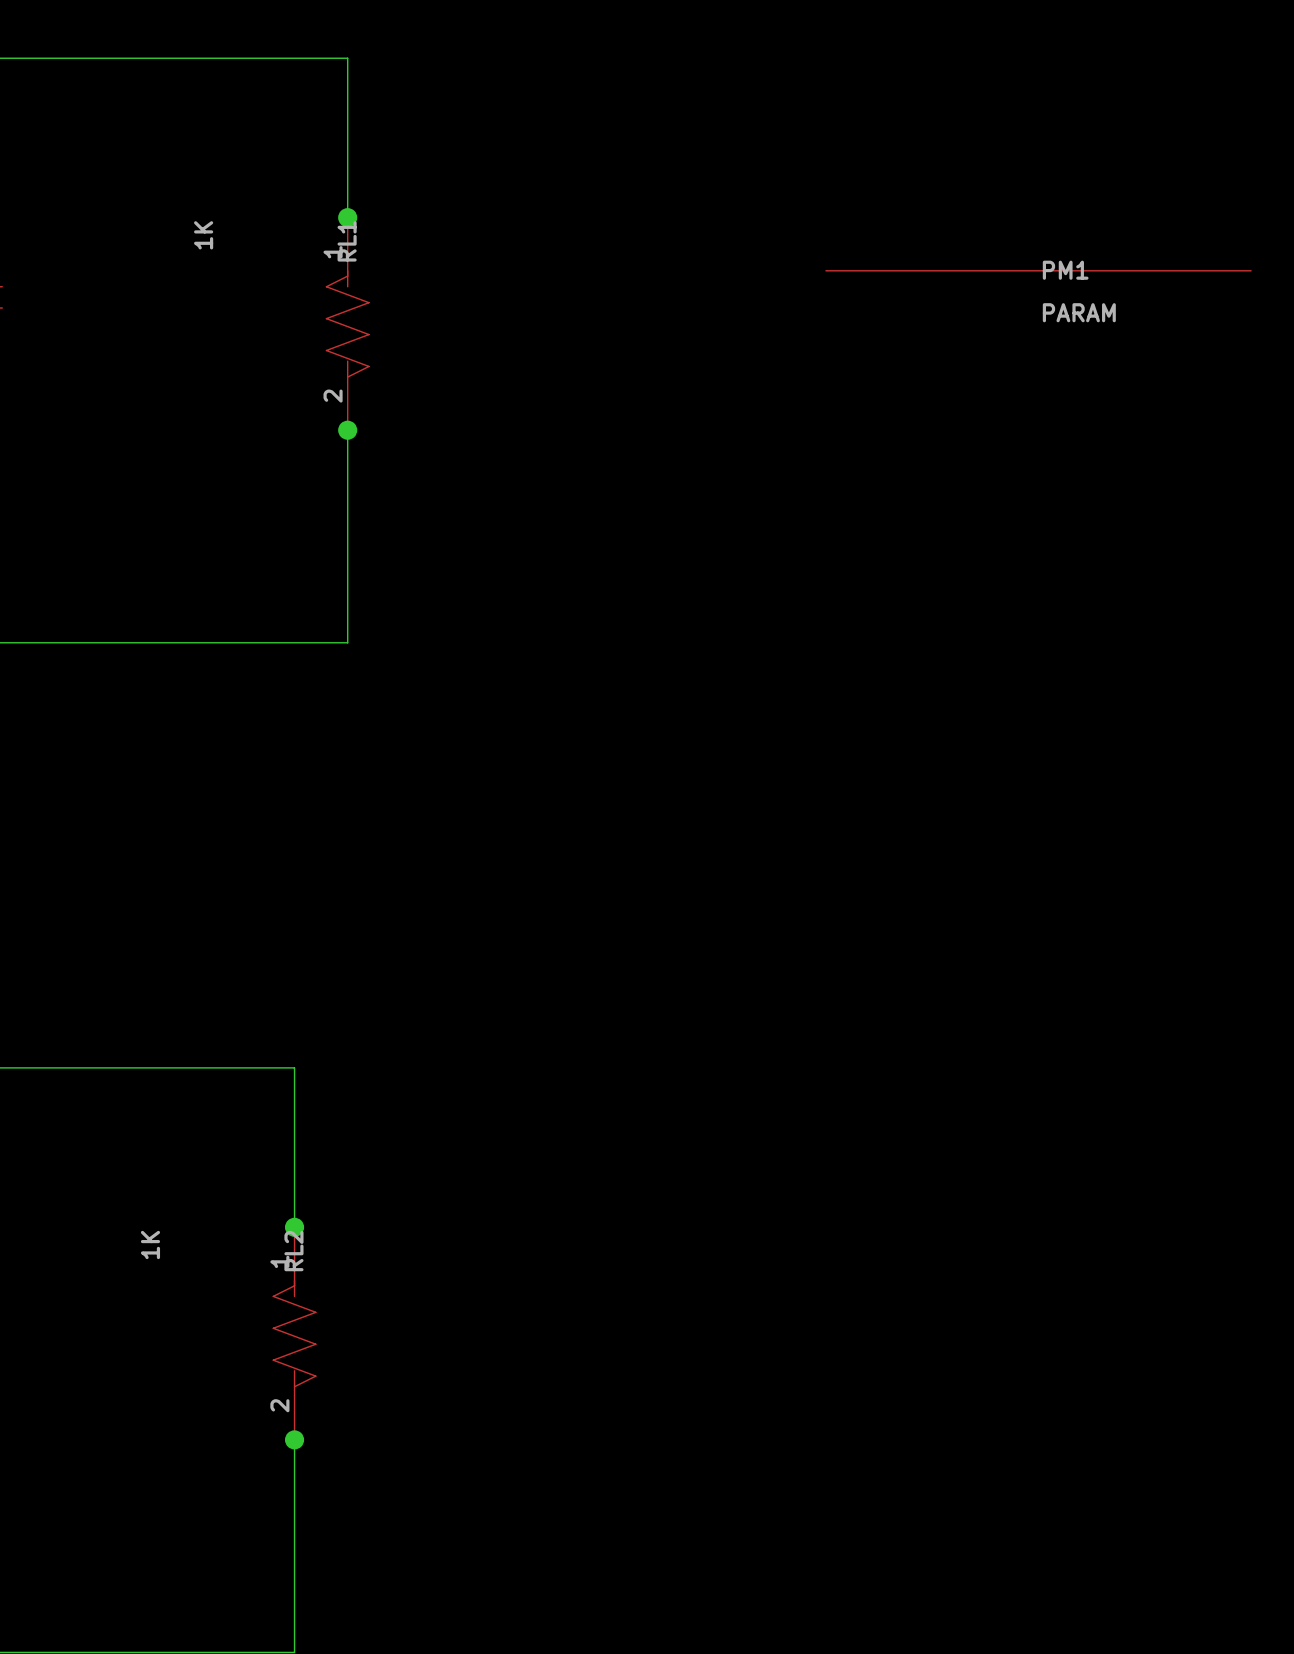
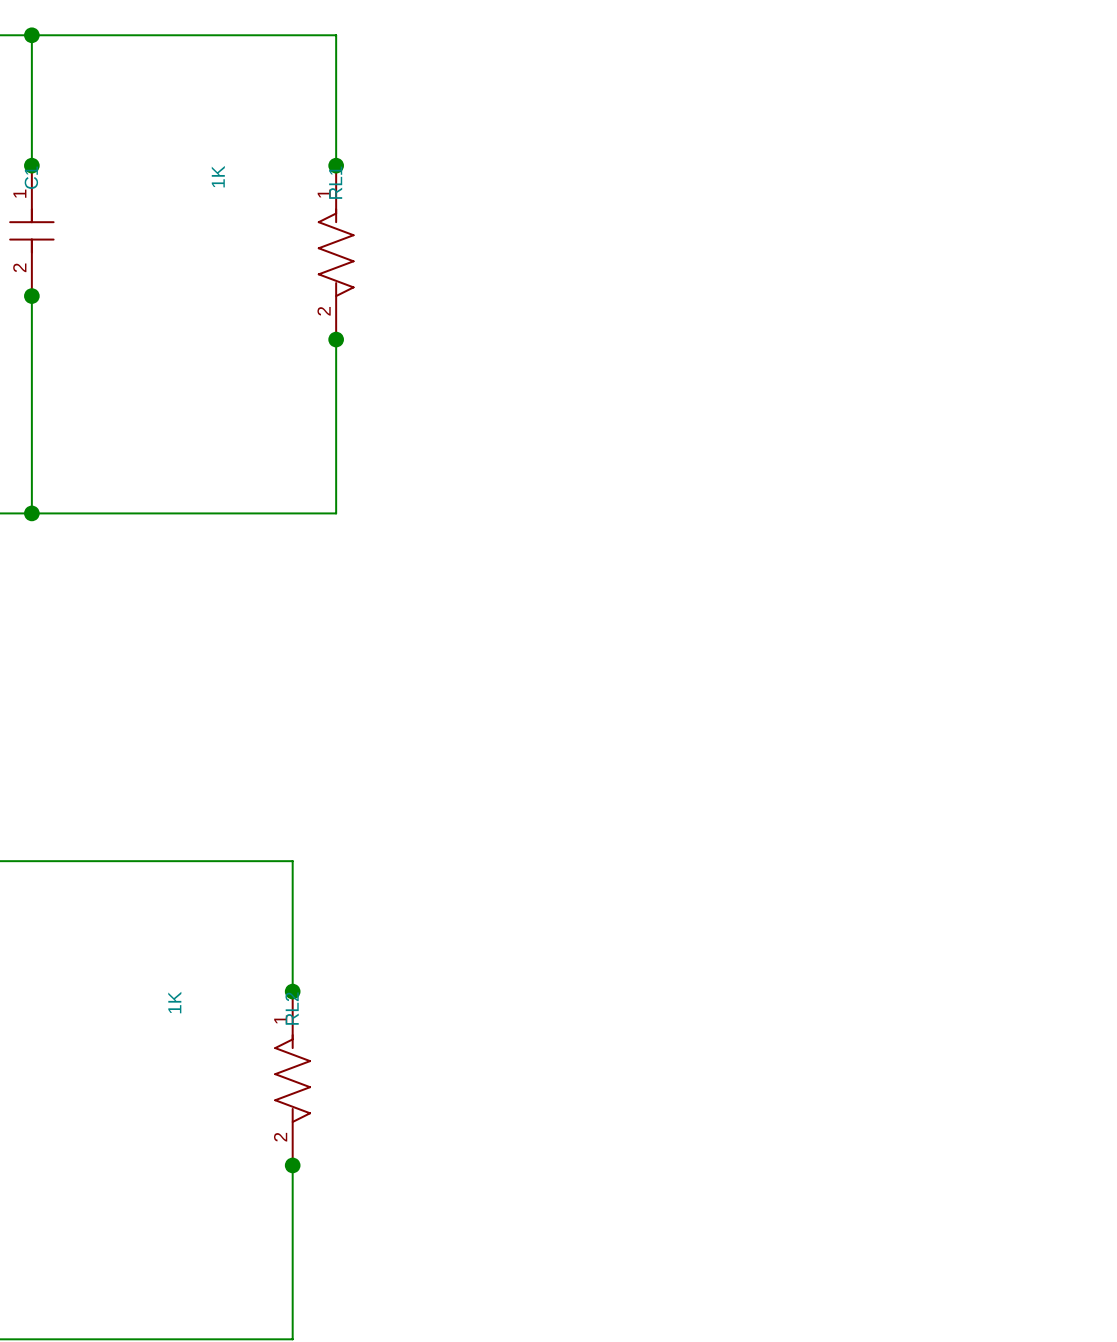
PM1: PARAM (1038, 270) -> none

